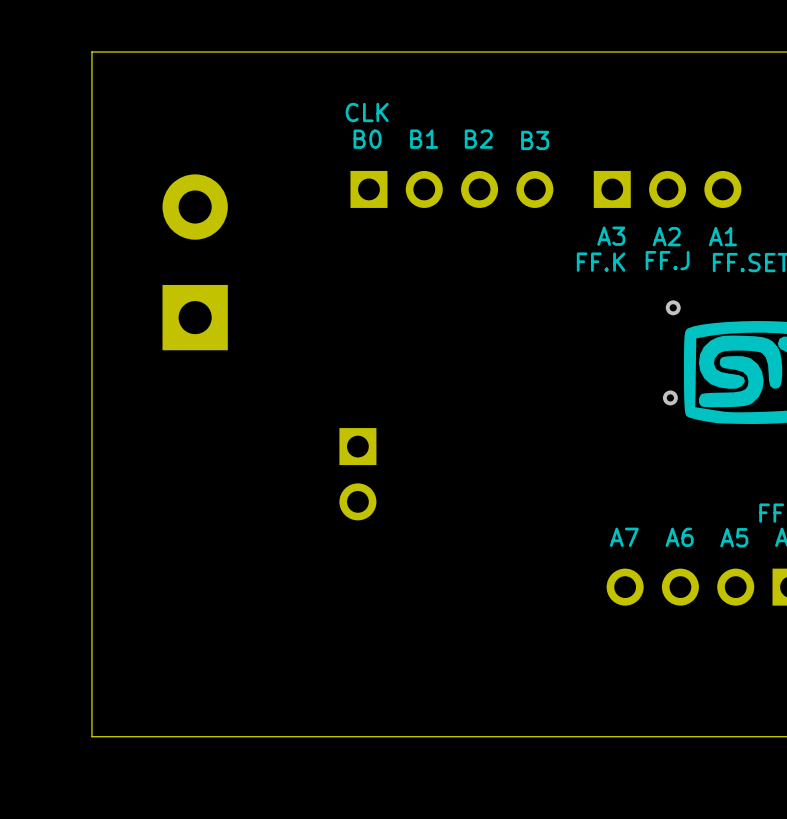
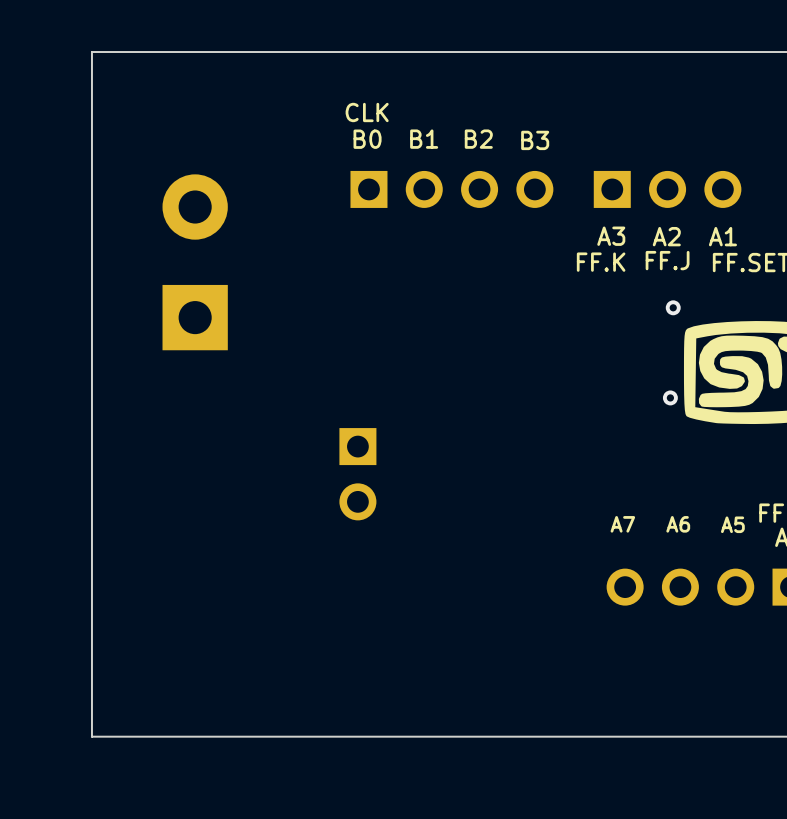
text position: A7 (624, 537) -> A7 (622, 524)
text position: A6 (679, 537) -> A6 (678, 524)
text position: A5 (734, 537) -> A5 (732, 524)

